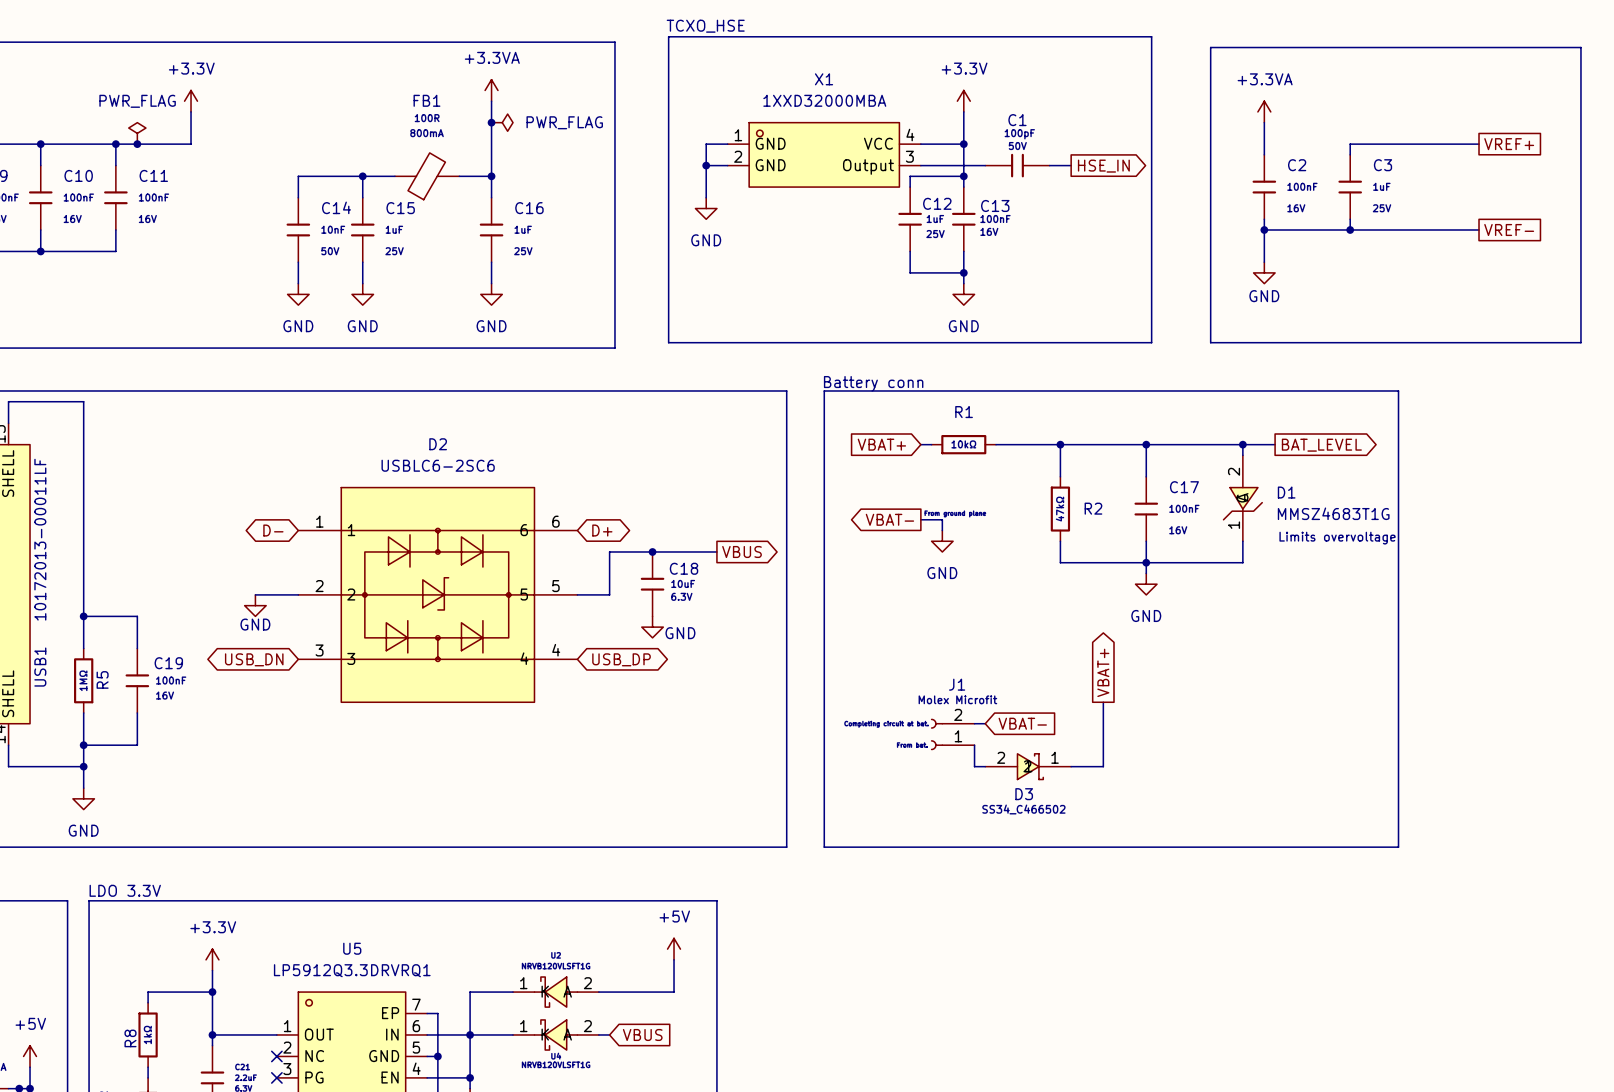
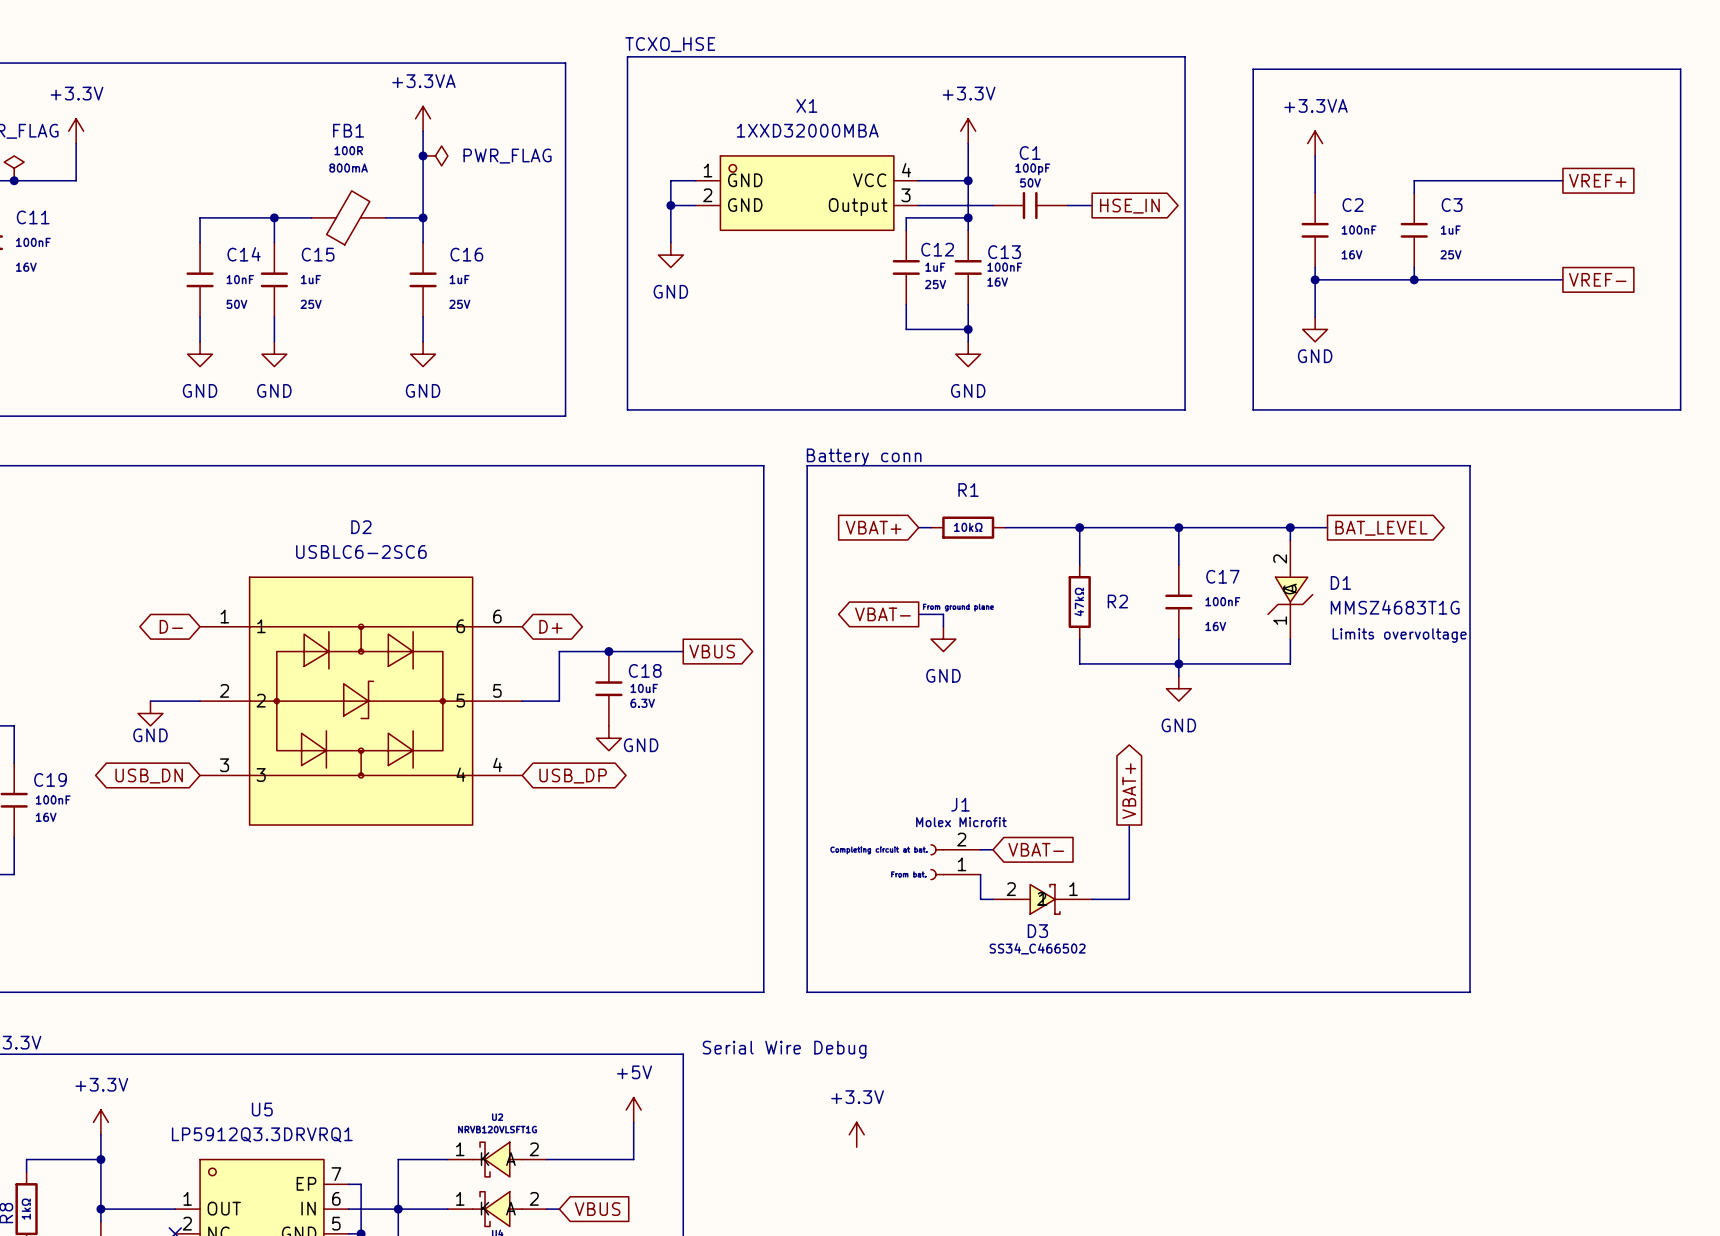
text: none -> Serial Wire Debug (784, 1049)
power symbol: none -> +3.3V (856, 1134)

